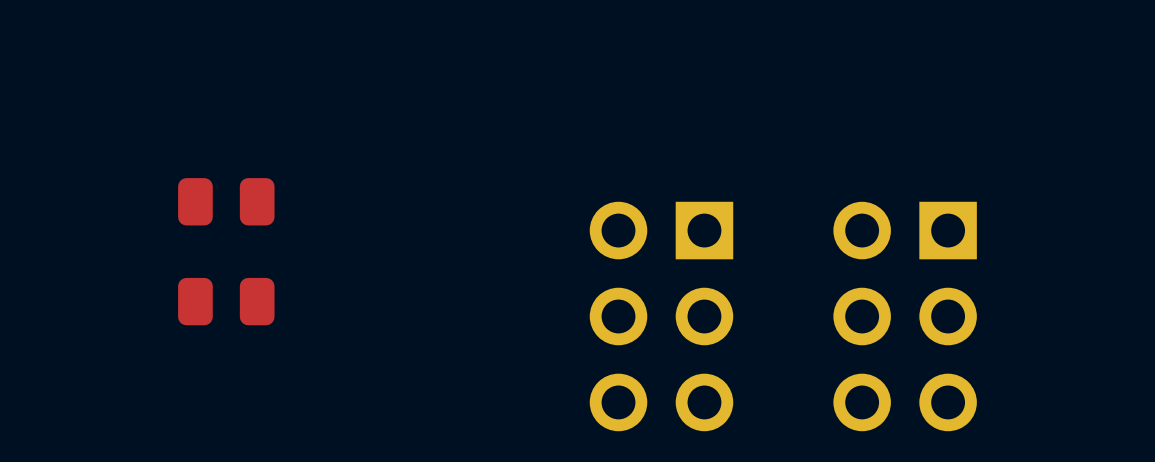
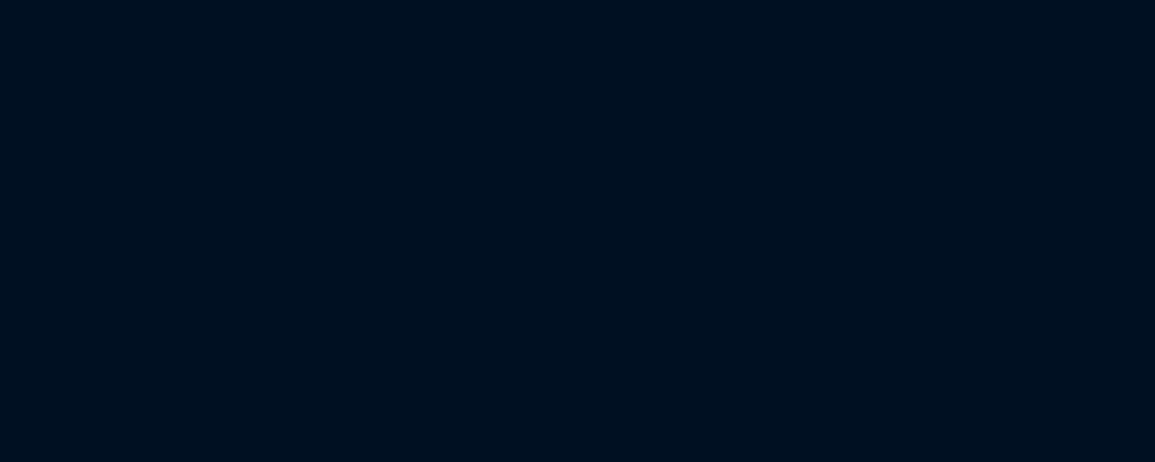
part: (226, 201) -> none
part: (226, 301) -> none
part: (661, 316) -> none
part: (905, 316) -> none

